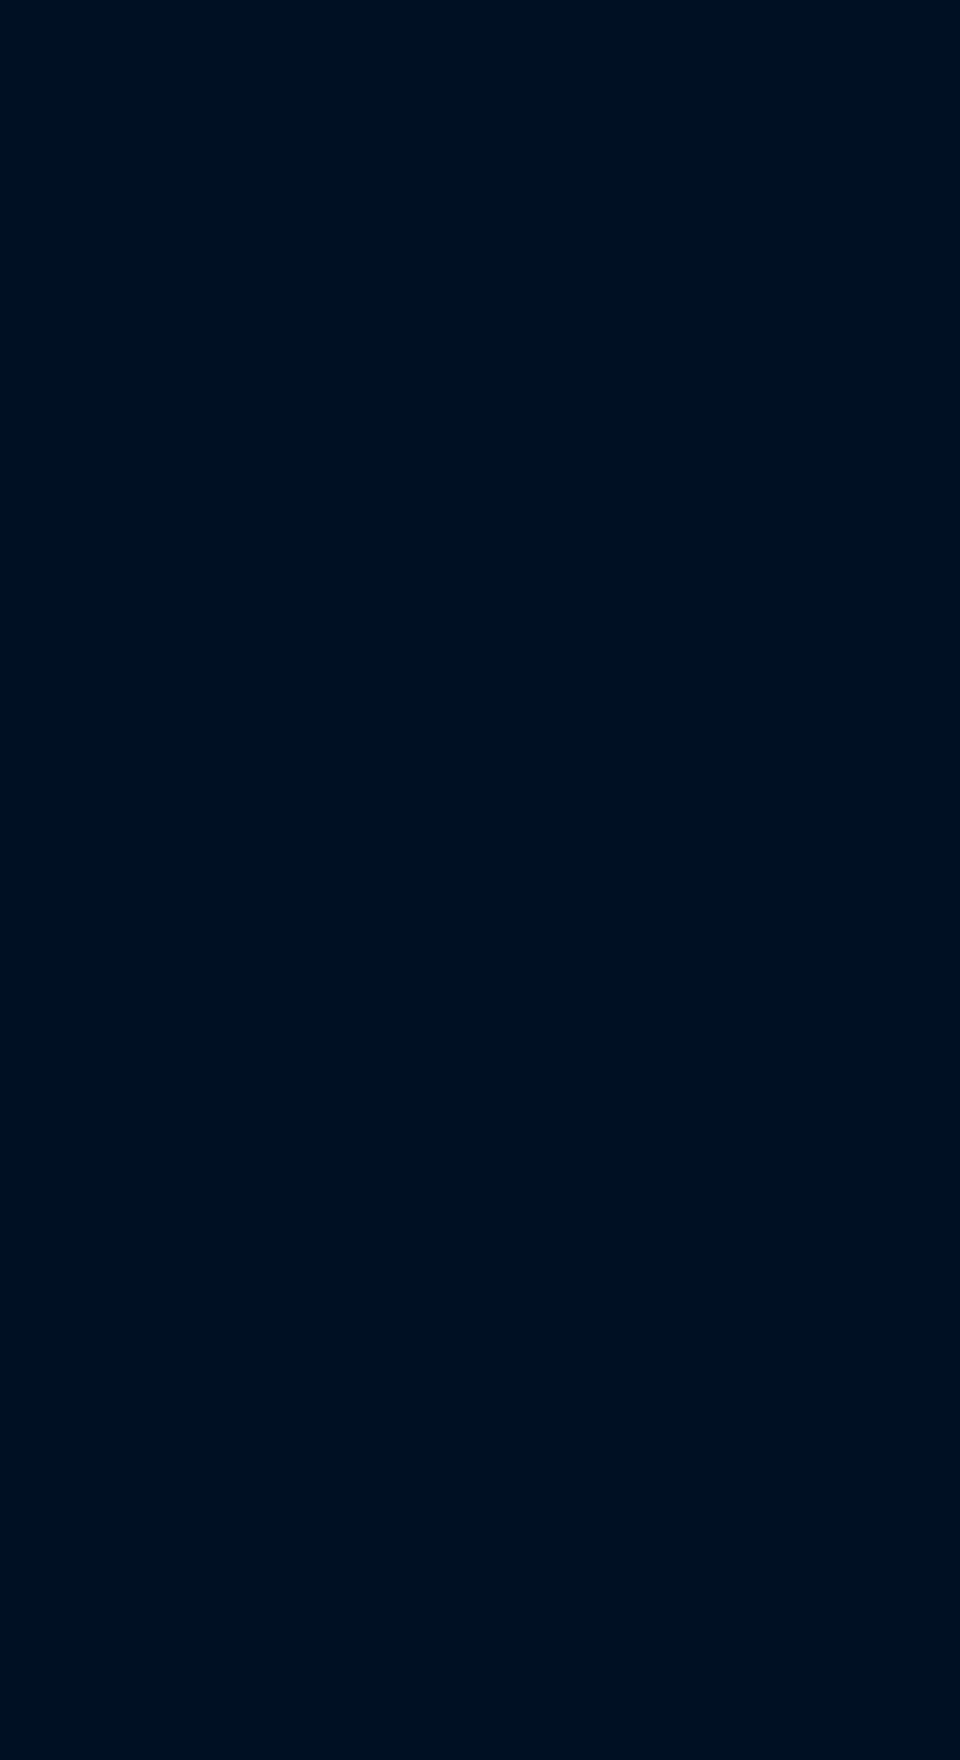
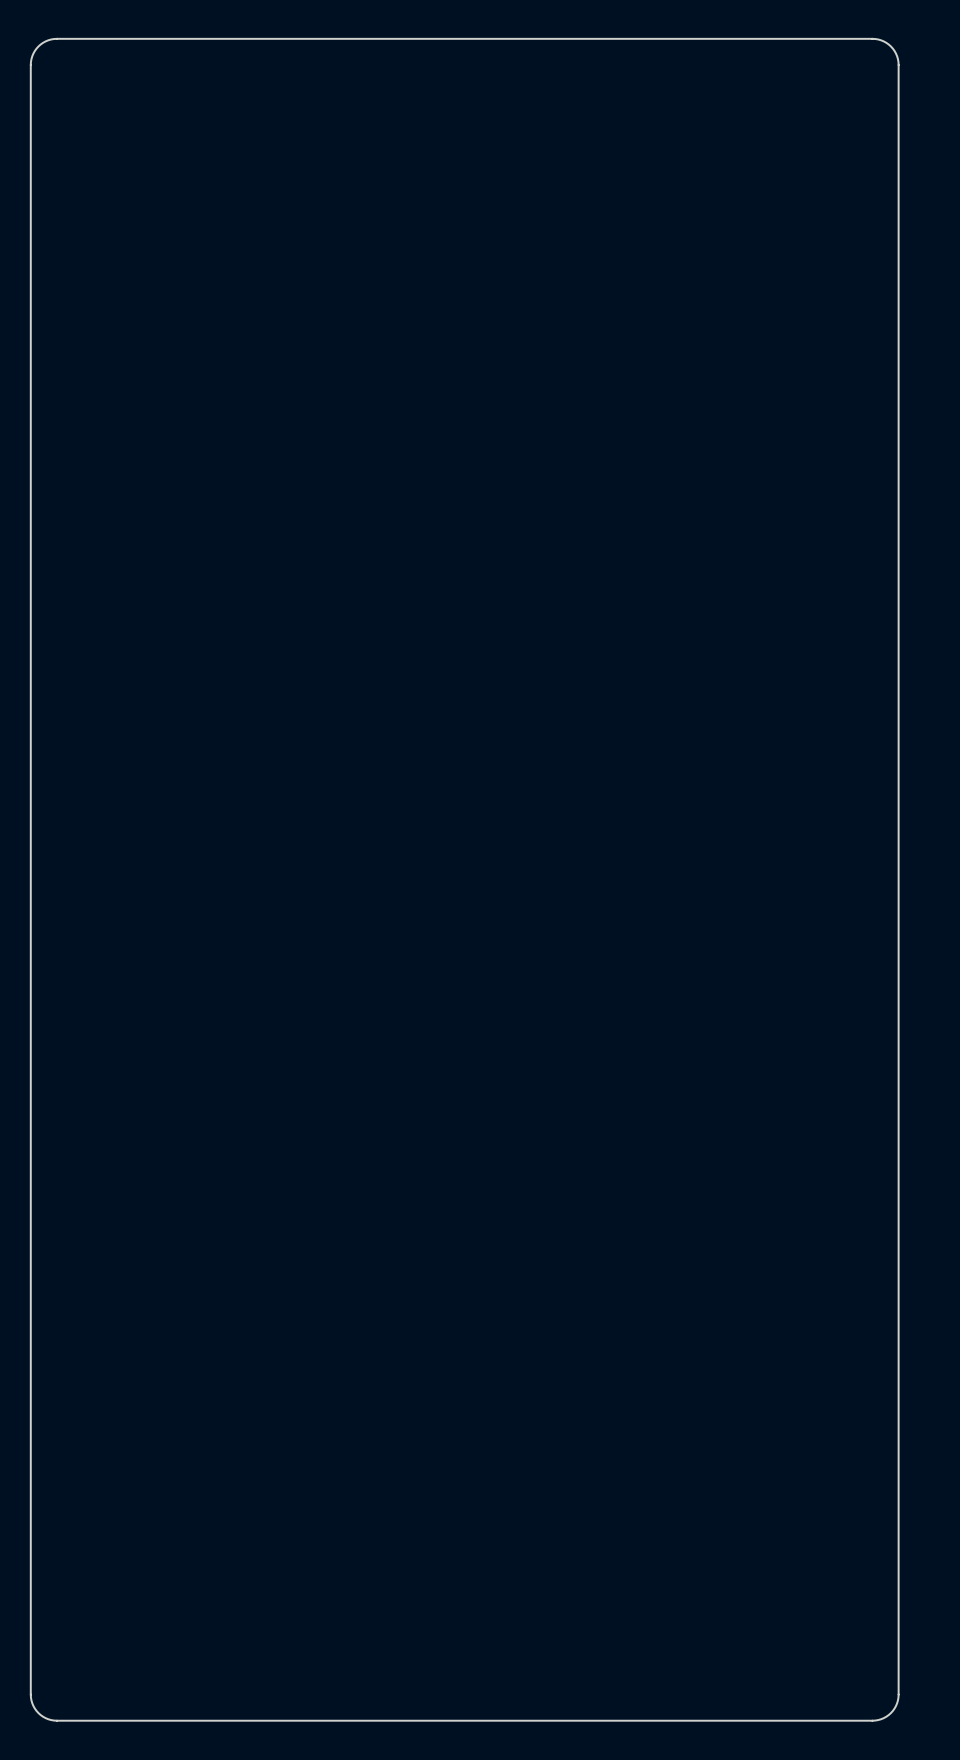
board edge: none -> (56, 38) (872, 38) (886, 42) (896, 53) (898, 65) (898, 1694) (894, 1708) (883, 1718) (872, 1720) (56, 1720) (43, 1716) (33, 1705) (30, 1694) (30, 65) (32, 56) (38, 46) (45, 41) (56, 38)

